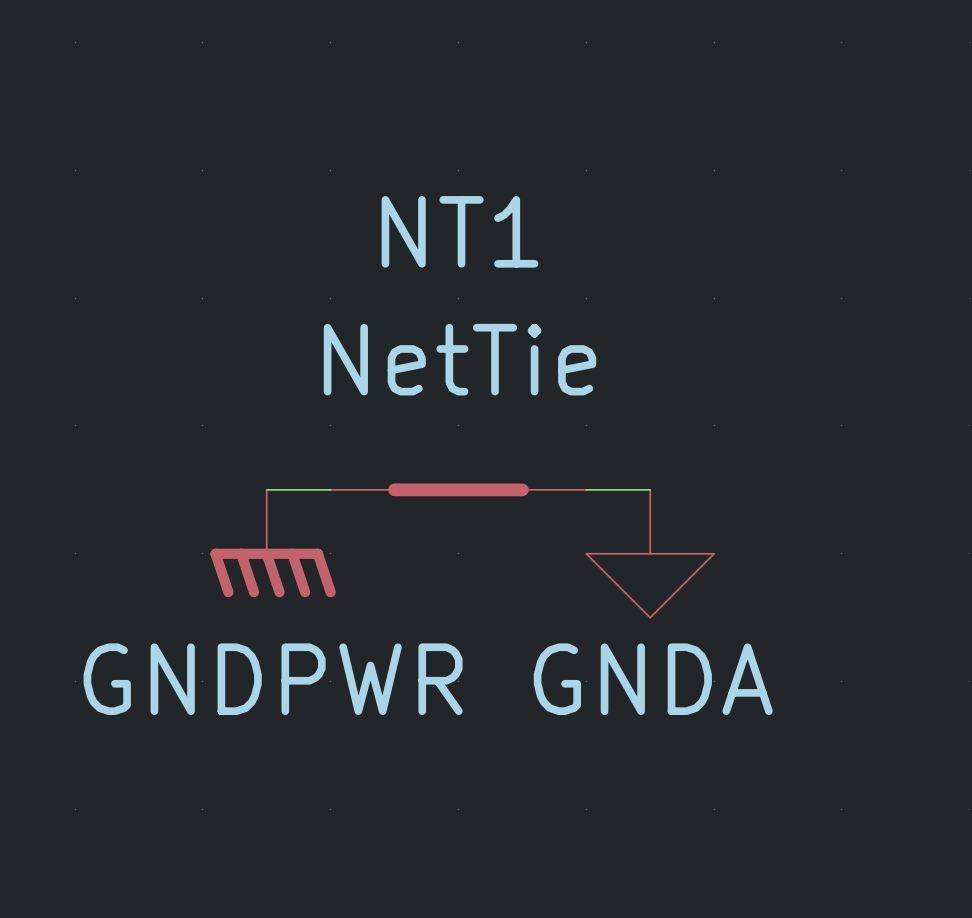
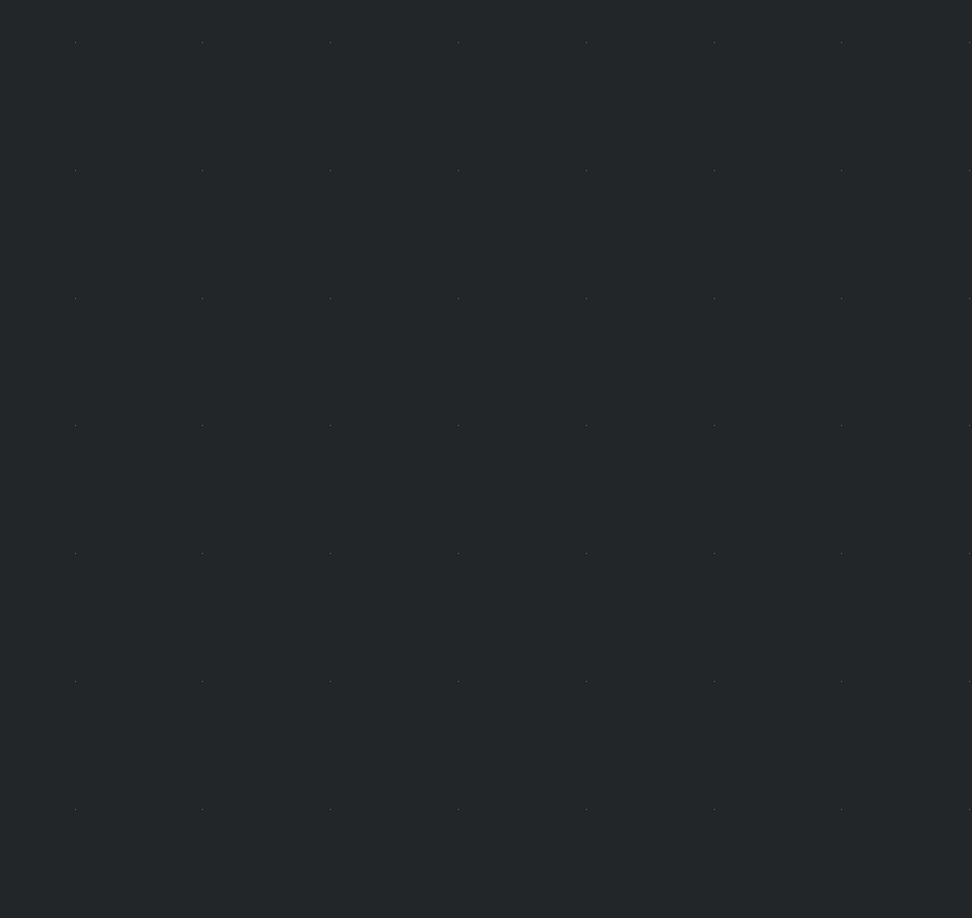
wire: (266, 489) (330, 489) -> none
NT1: NetTie (458, 489) -> none
wire: (586, 489) (650, 489) -> none
power symbol: GNDPWR (273, 543) -> none
power symbol: GNDA (650, 553) -> none

